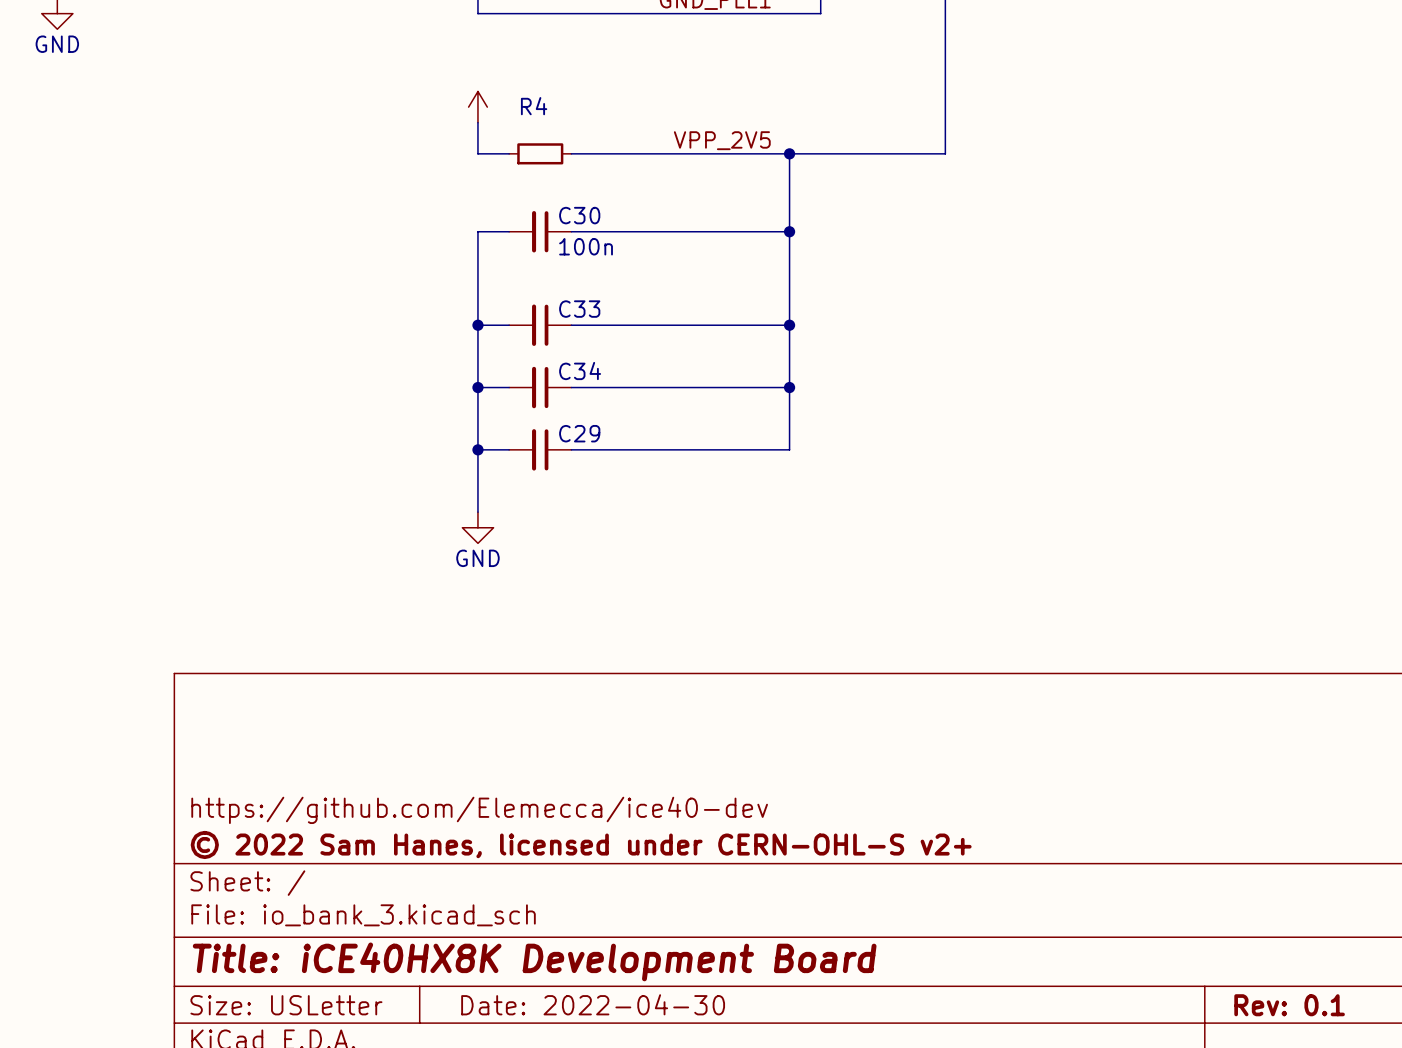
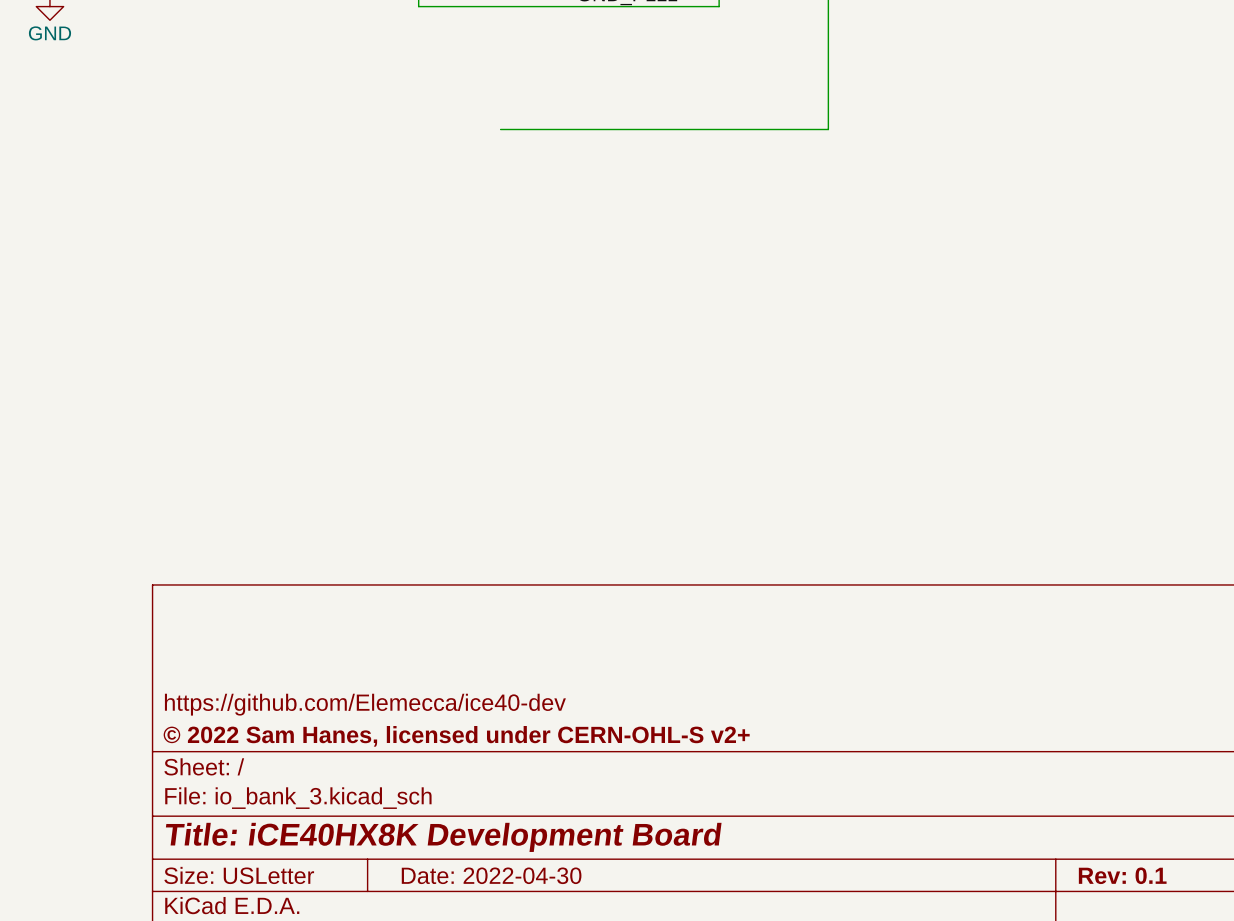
power symbol: (477, 107) -> none
wire: (477, 122) (477, 153) (509, 153) -> none
label: VPP_2V5 (722, 140) -> none
R4: (540, 153) -> none
wire: (789, 153) (789, 449) (571, 449) -> none
junction: (789, 153) -> none
wire: (509, 231) (477, 231) (477, 512) -> none
C30: 100n (540, 231) -> none
wire: (571, 231) (789, 231) -> none
junction: (789, 231) -> none
wire: (477, 325) (509, 325) -> none
junction: (477, 325) -> none
C33: (540, 325) -> none
wire: (571, 325) (789, 325) -> none
junction: (789, 325) -> none
wire: (477, 387) (509, 387) -> none
junction: (477, 387) -> none
C34: (540, 387) -> none
wire: (571, 387) (789, 387) -> none
junction: (789, 387) -> none
wire: (477, 449) (509, 449) -> none
junction: (477, 449) -> none
C29: (540, 449) -> none
power symbol: GND (477, 527) -> none

